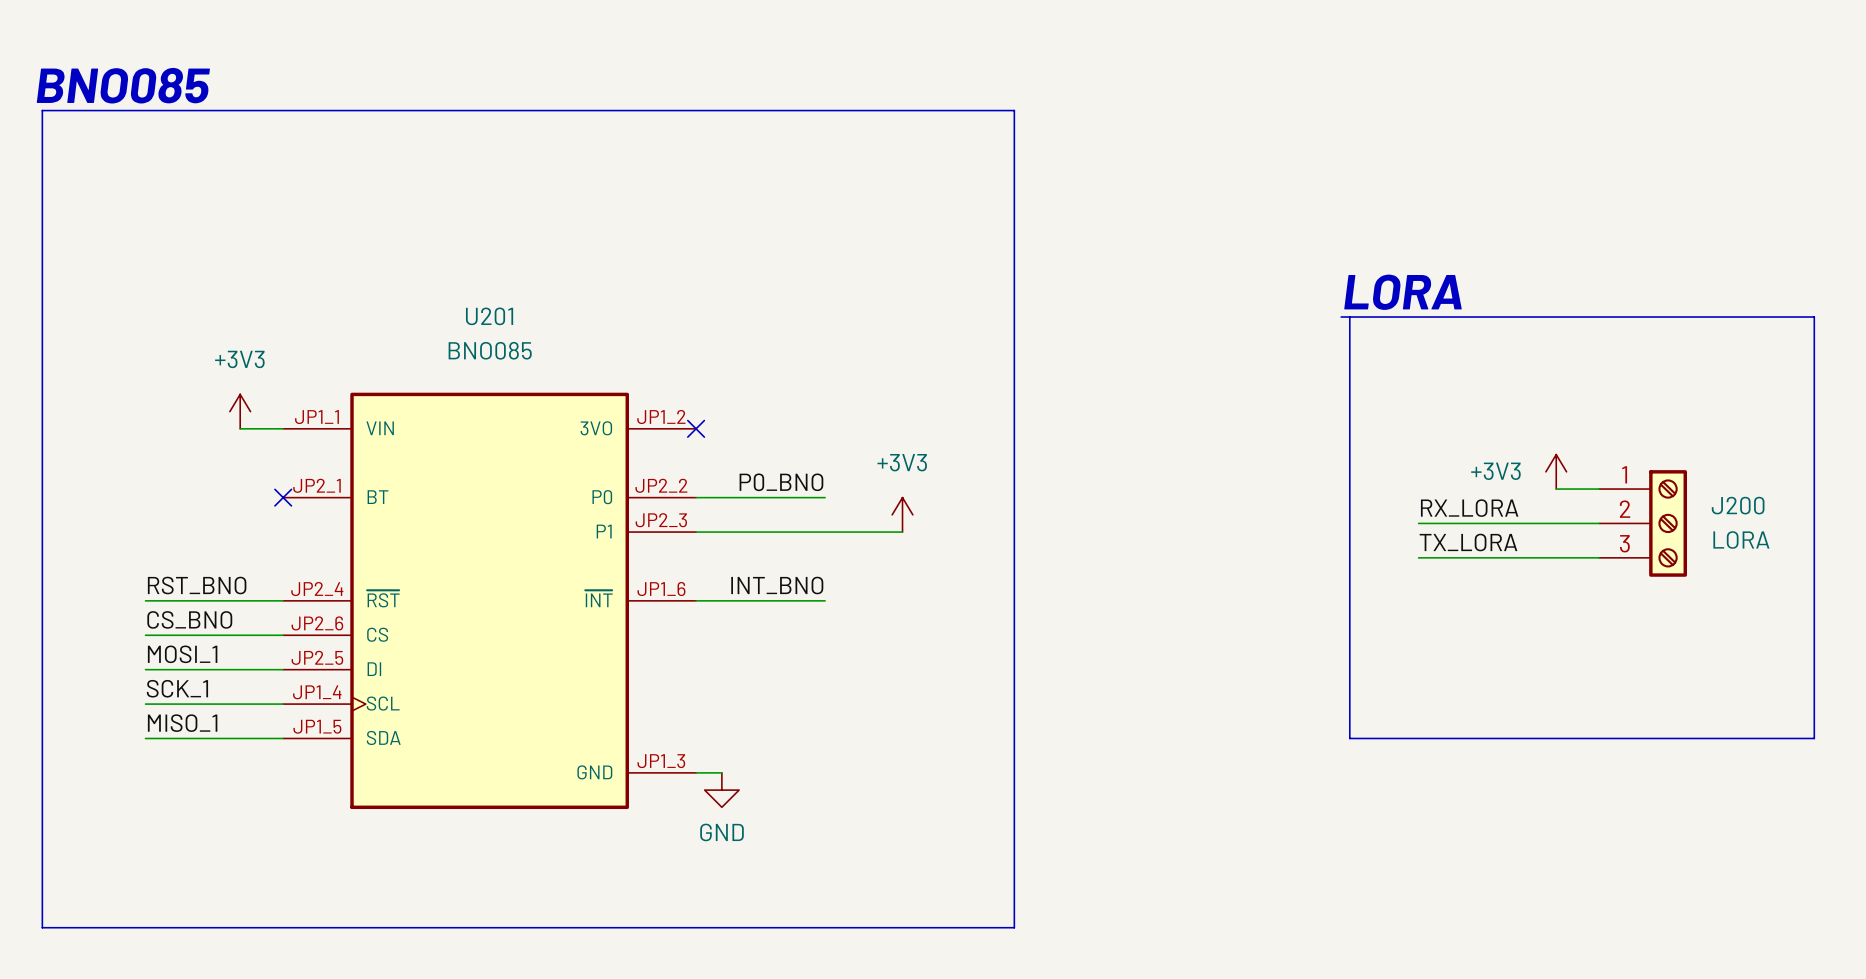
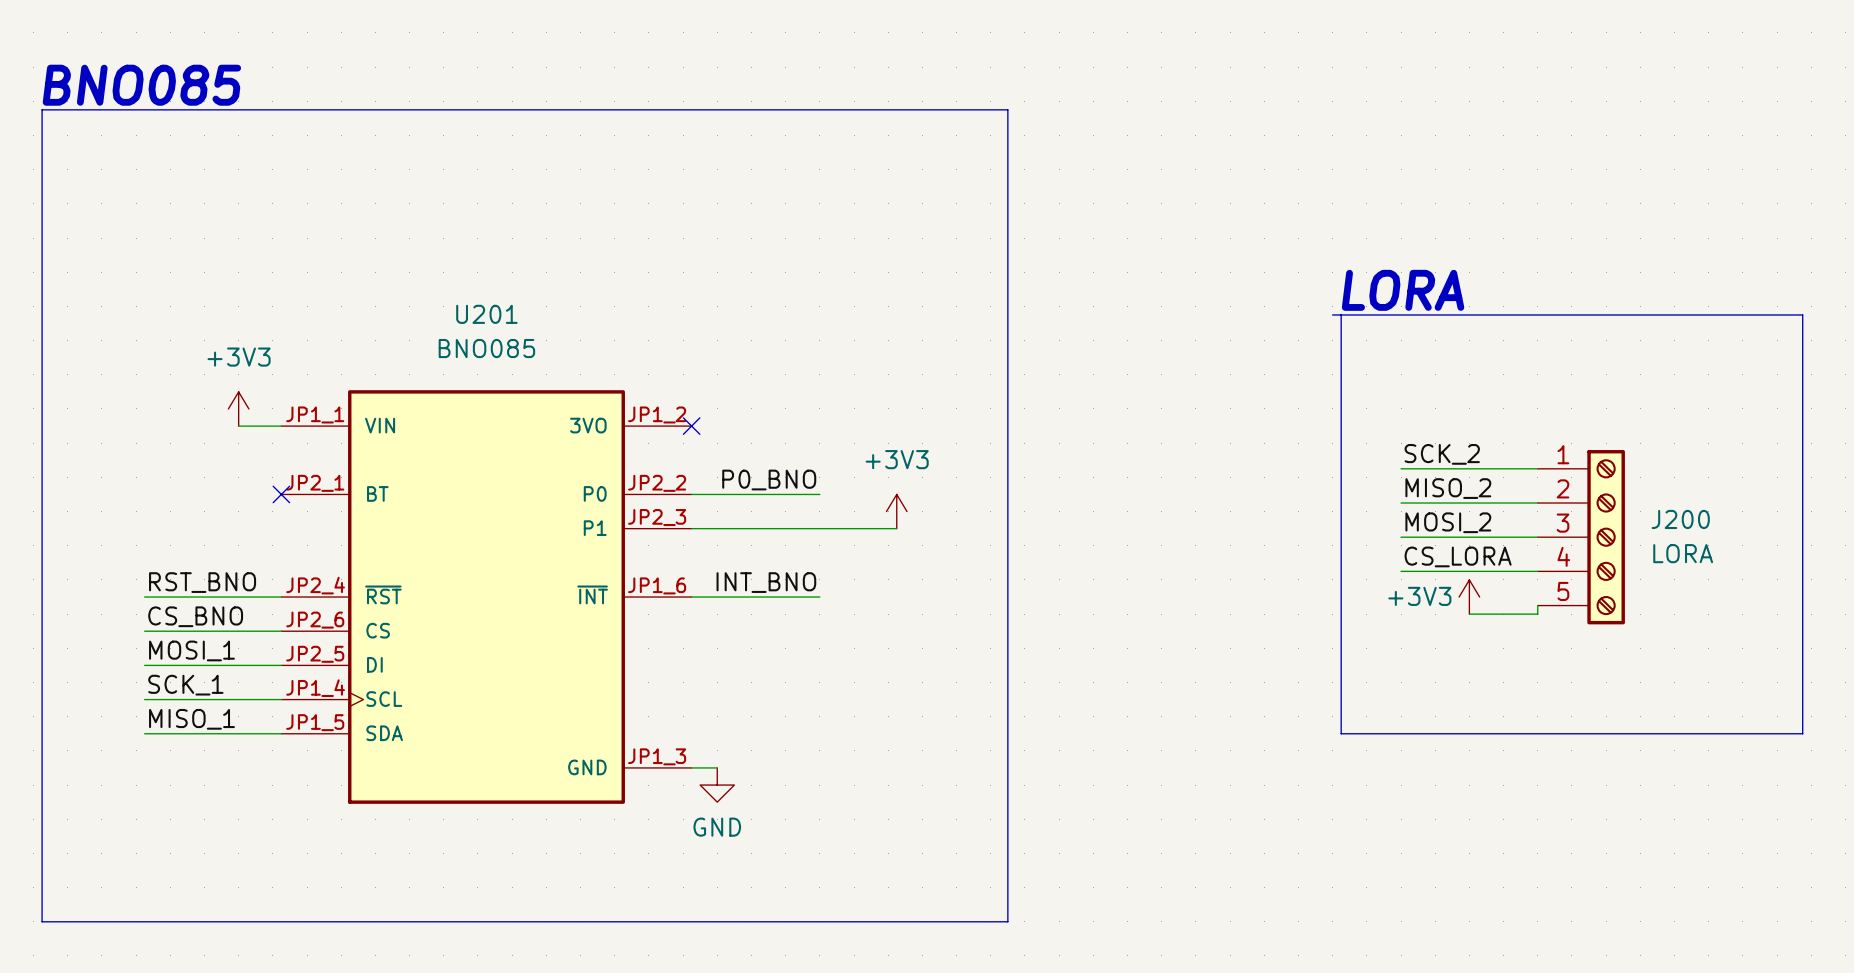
label: none -> SCK_2 (1442, 454)
J200 symbol: [1599, 470, 1687, 577] -> [1537, 450, 1625, 625]
wire: none -> (1401, 468) (1537, 468)
power symbol position: +3V3 (1556, 471) -> +3V3 (1469, 597)
wire: (1556, 489) (1599, 489) -> none
label: none -> MISO_2 (1448, 488)
wire: none -> (1401, 503) (1537, 503)
label: RX_LORA (1469, 508) -> none
wire: (1418, 523) (1599, 523) -> none
label: none -> MOSI_2 (1448, 522)
wire: none -> (1401, 537) (1537, 537)
label: TX_LORA (1468, 542) -> CS_LORA (1458, 556)
wire: (1418, 557) (1599, 557) -> none
wire: none -> (1401, 571) (1537, 571)
wire: none -> (1537, 605) (1537, 614) (1469, 614)

